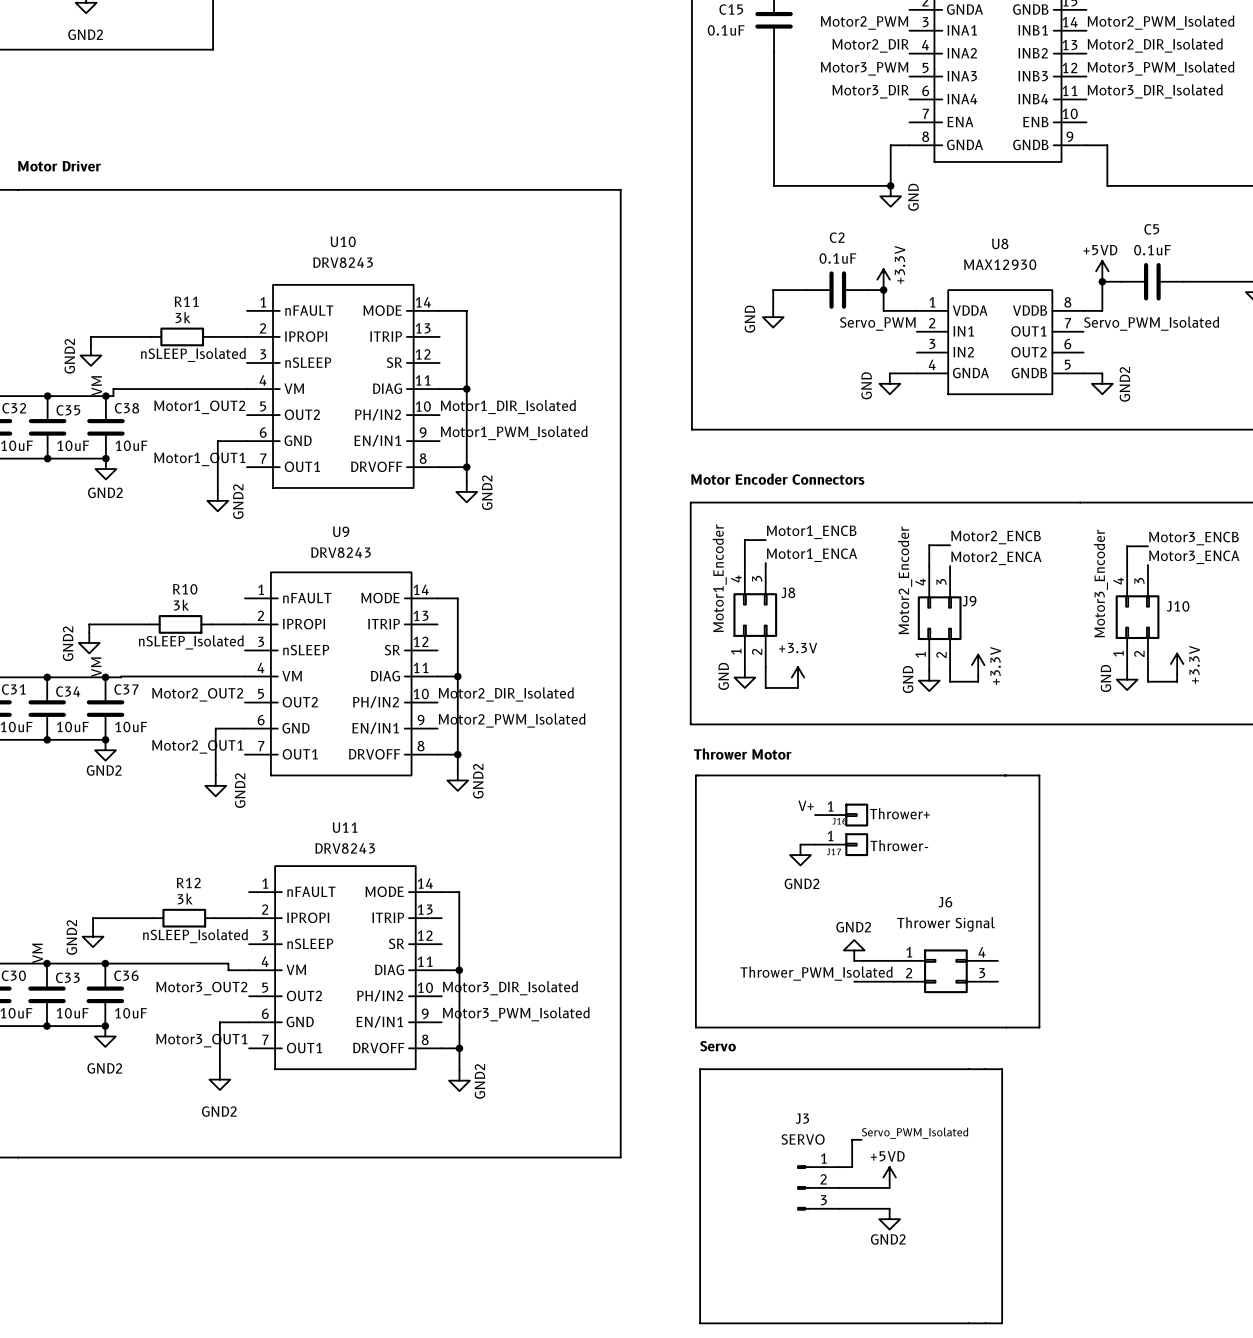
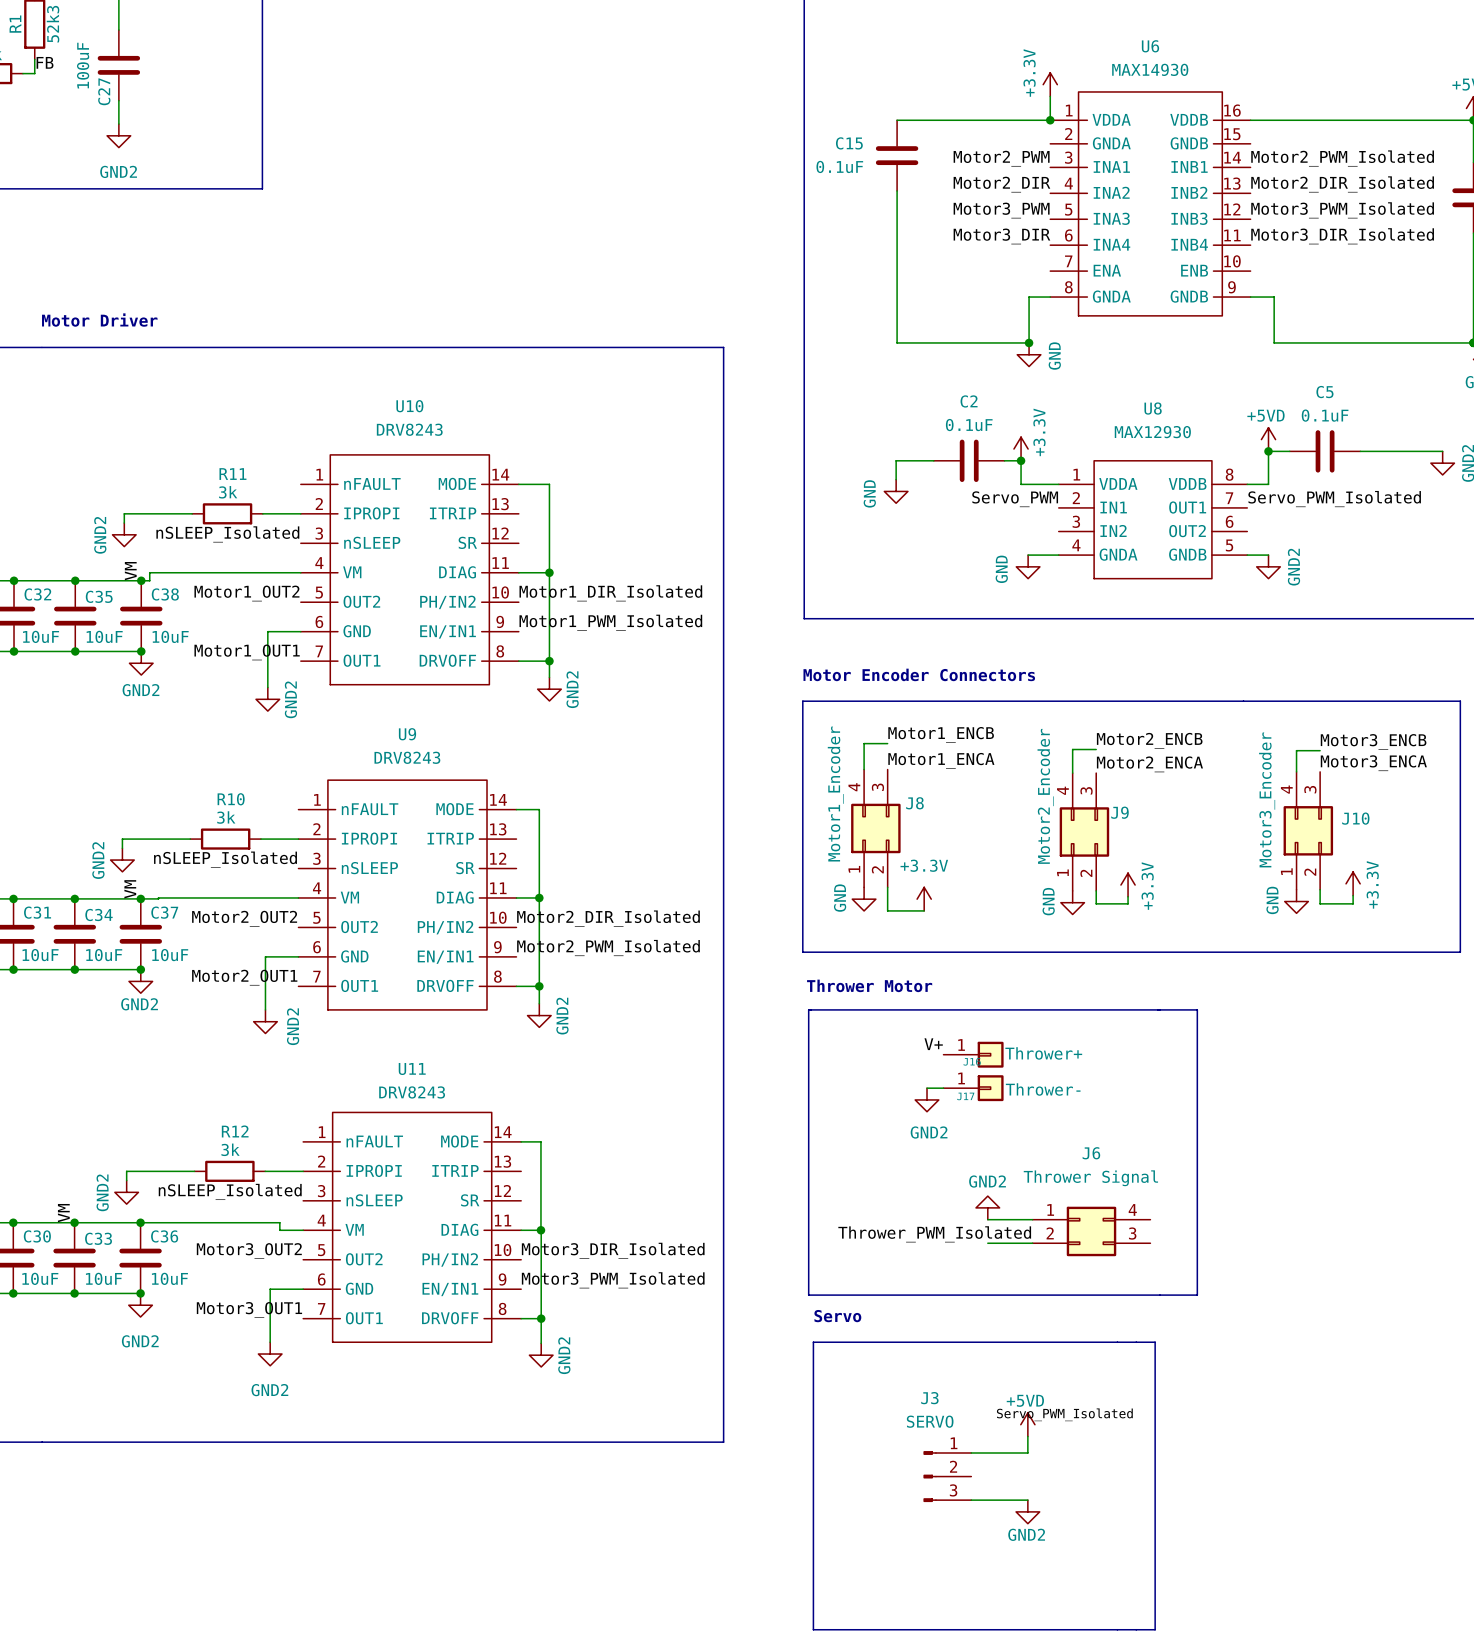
wire: (861, 1139) (852, 1139) (852, 1167) -> (1027, 1436) (1027, 1452) (985, 1452)
power symbol position: +5VD (889, 1177) -> +5VD (1027, 1424)
wire: (839, 1187) (889, 1187) -> none

